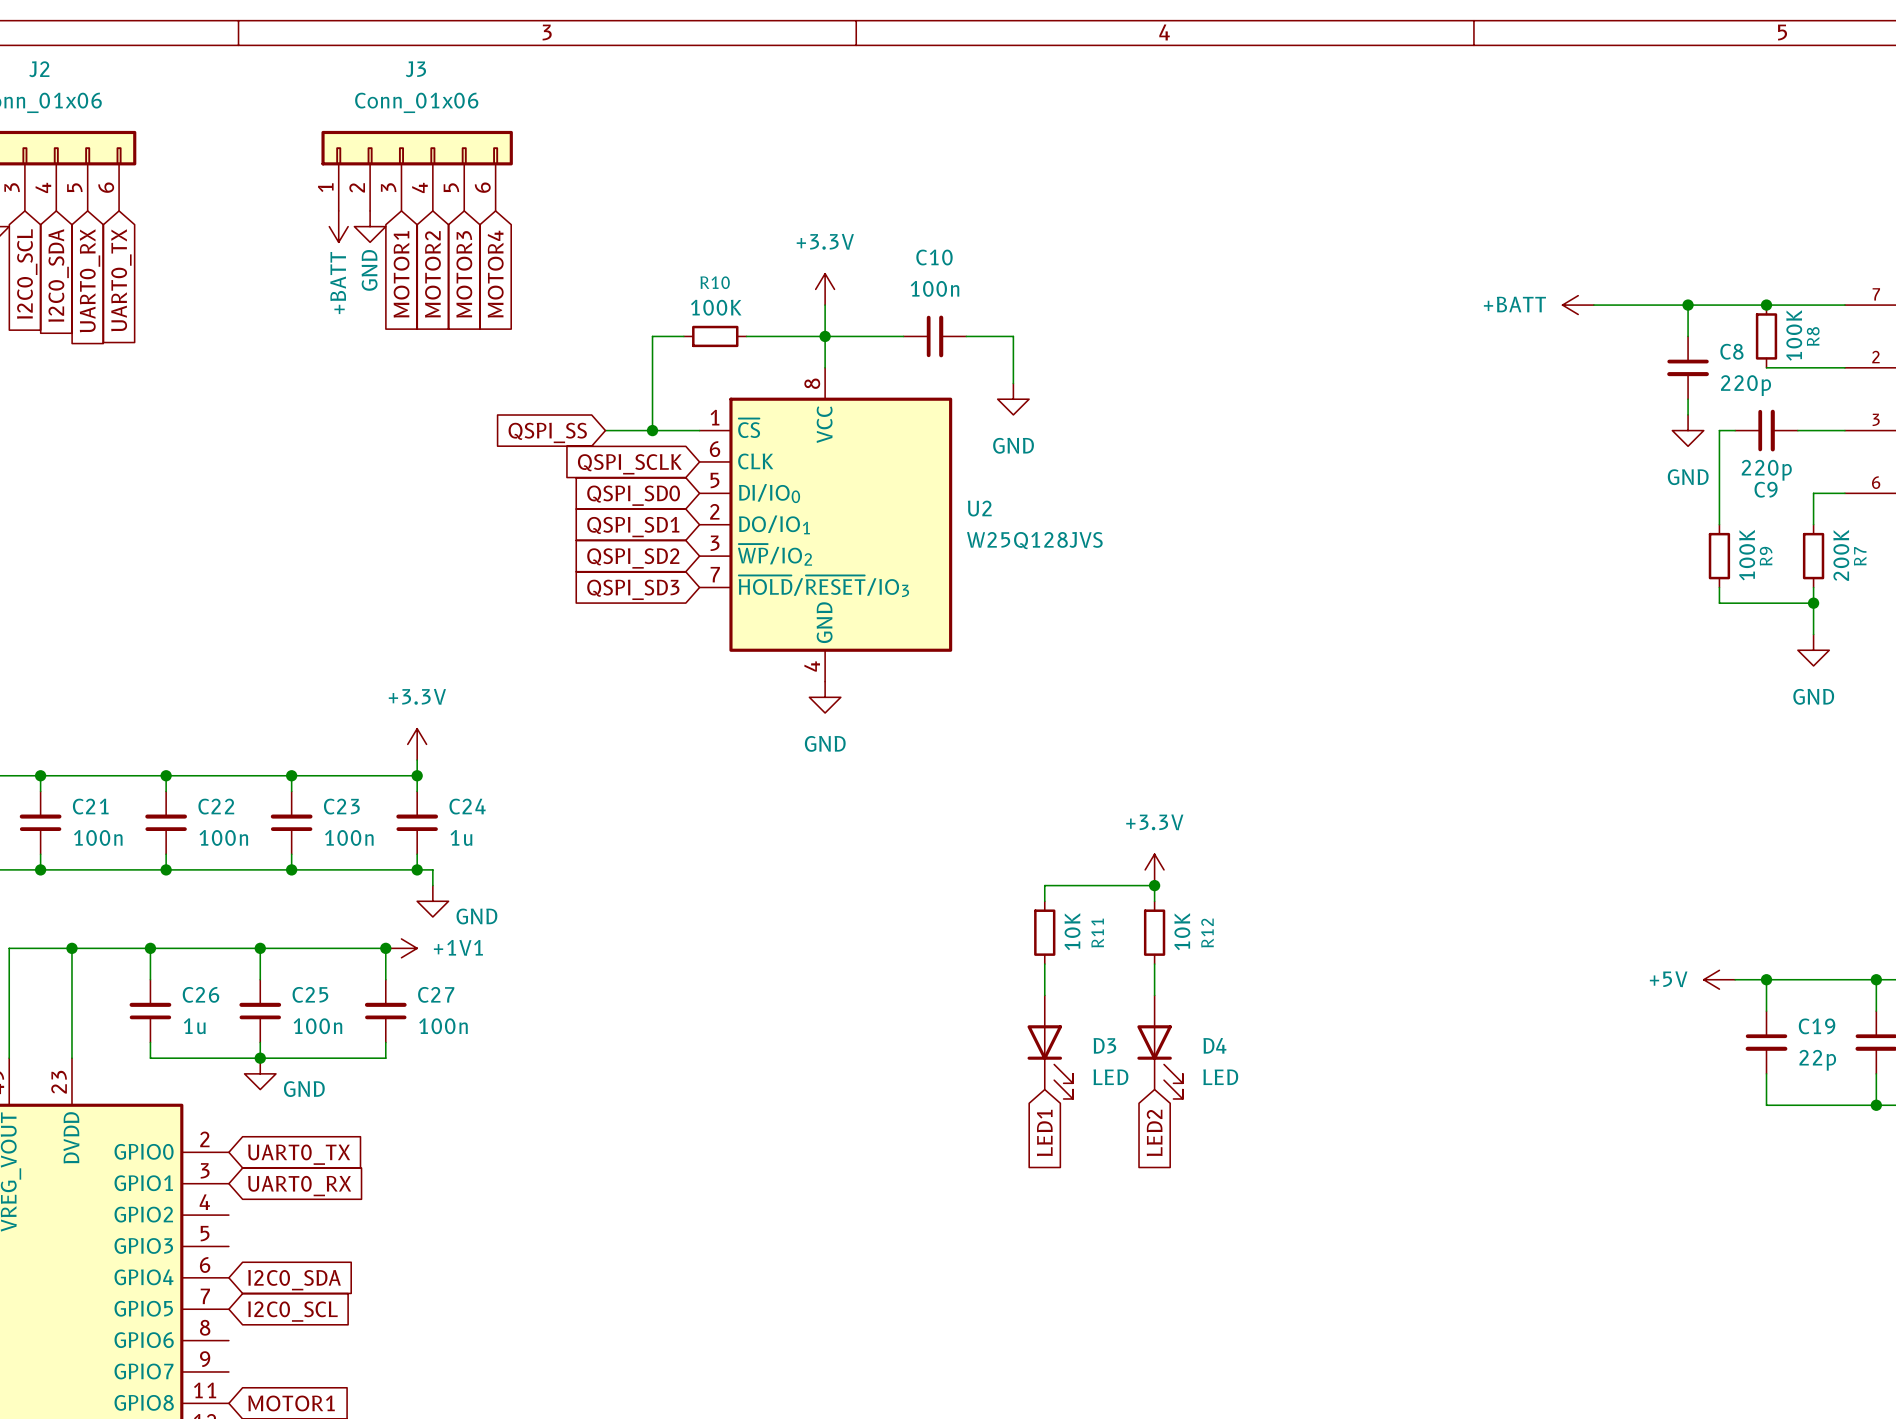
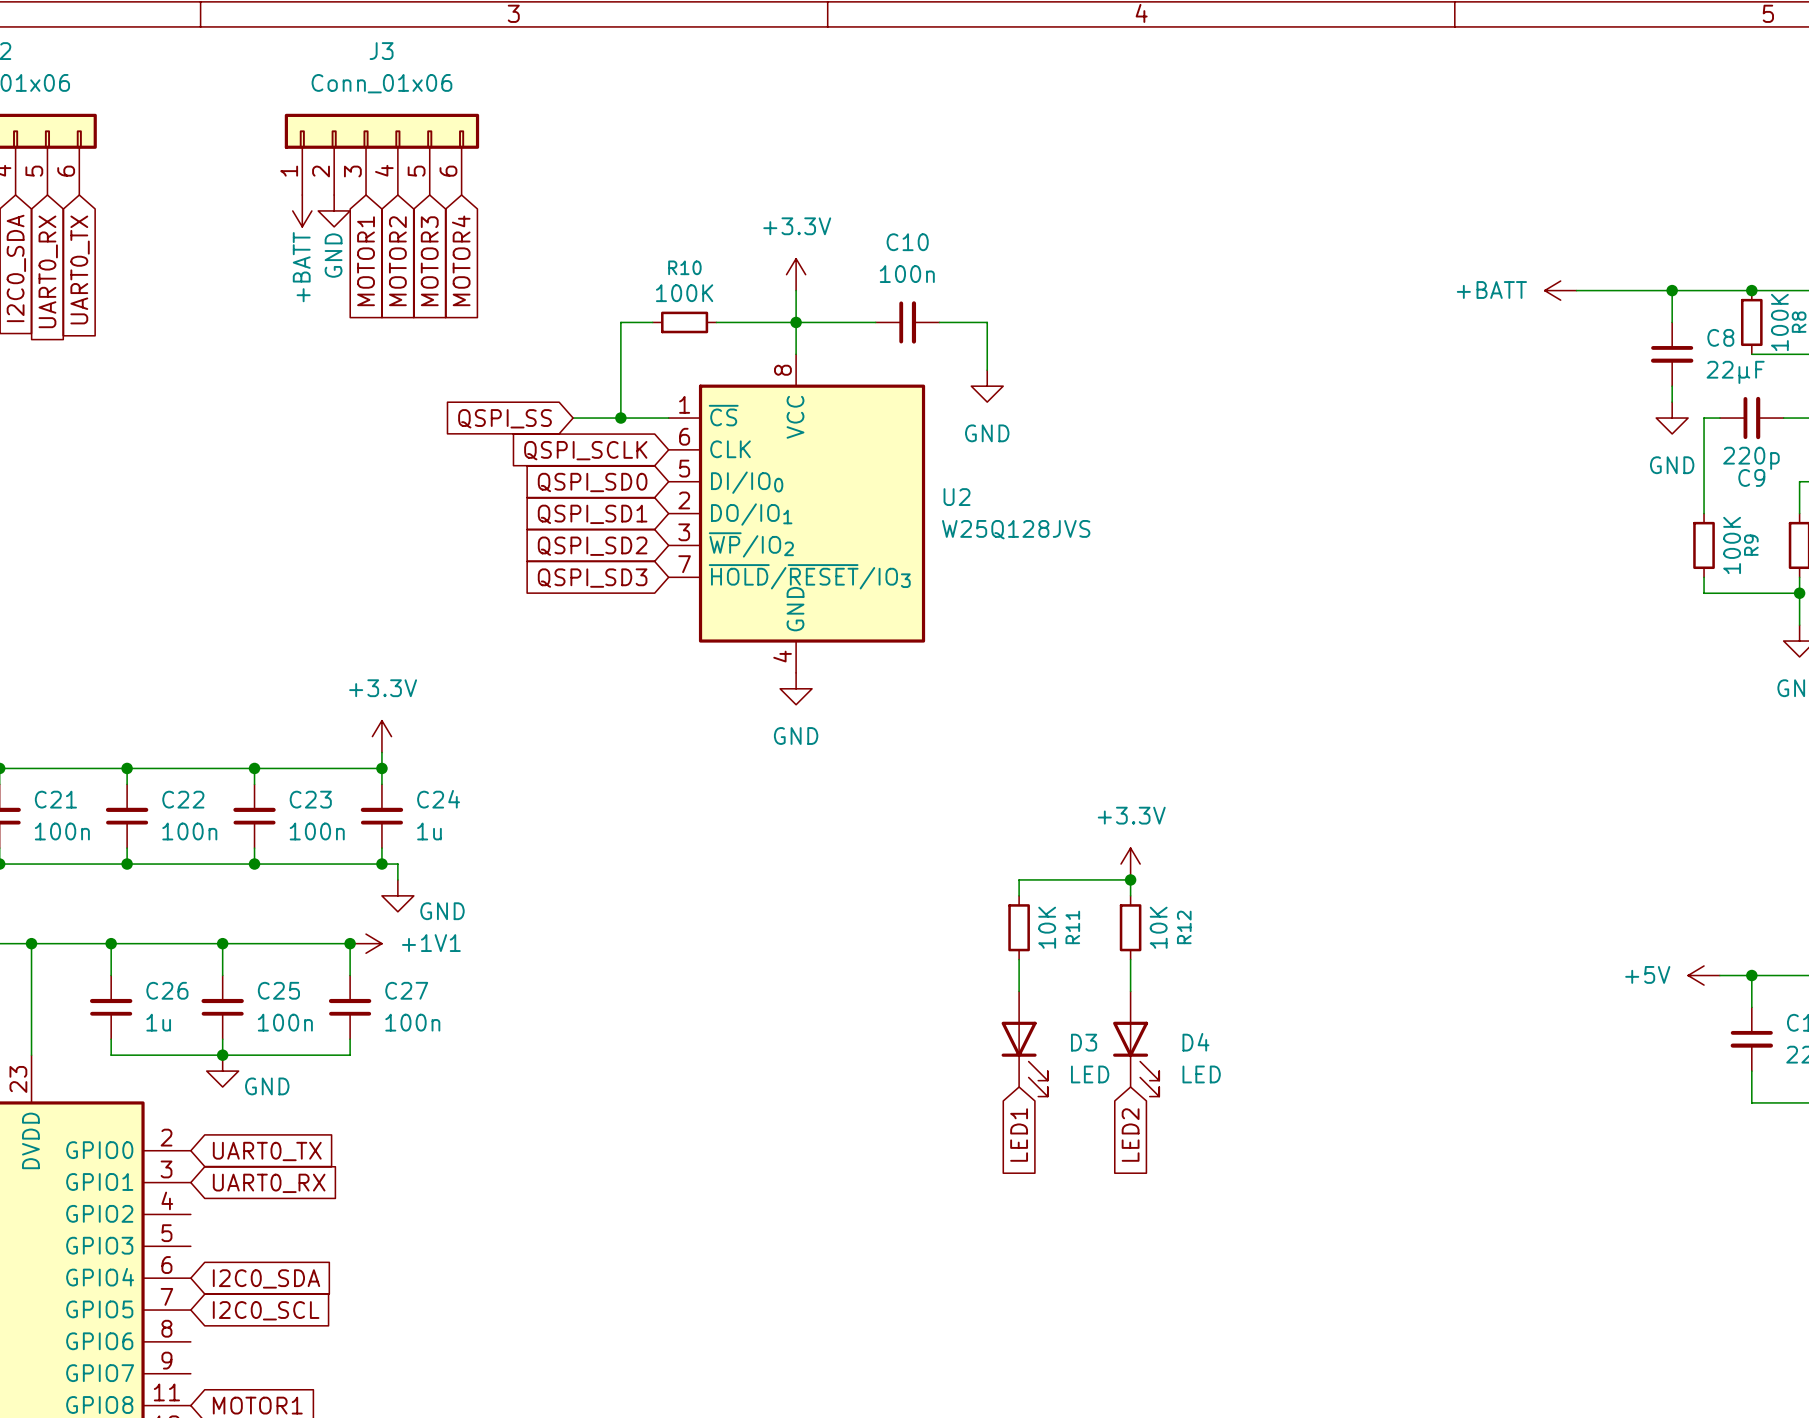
C8 value: 220p (1746, 385) -> 22µF (1735, 372)

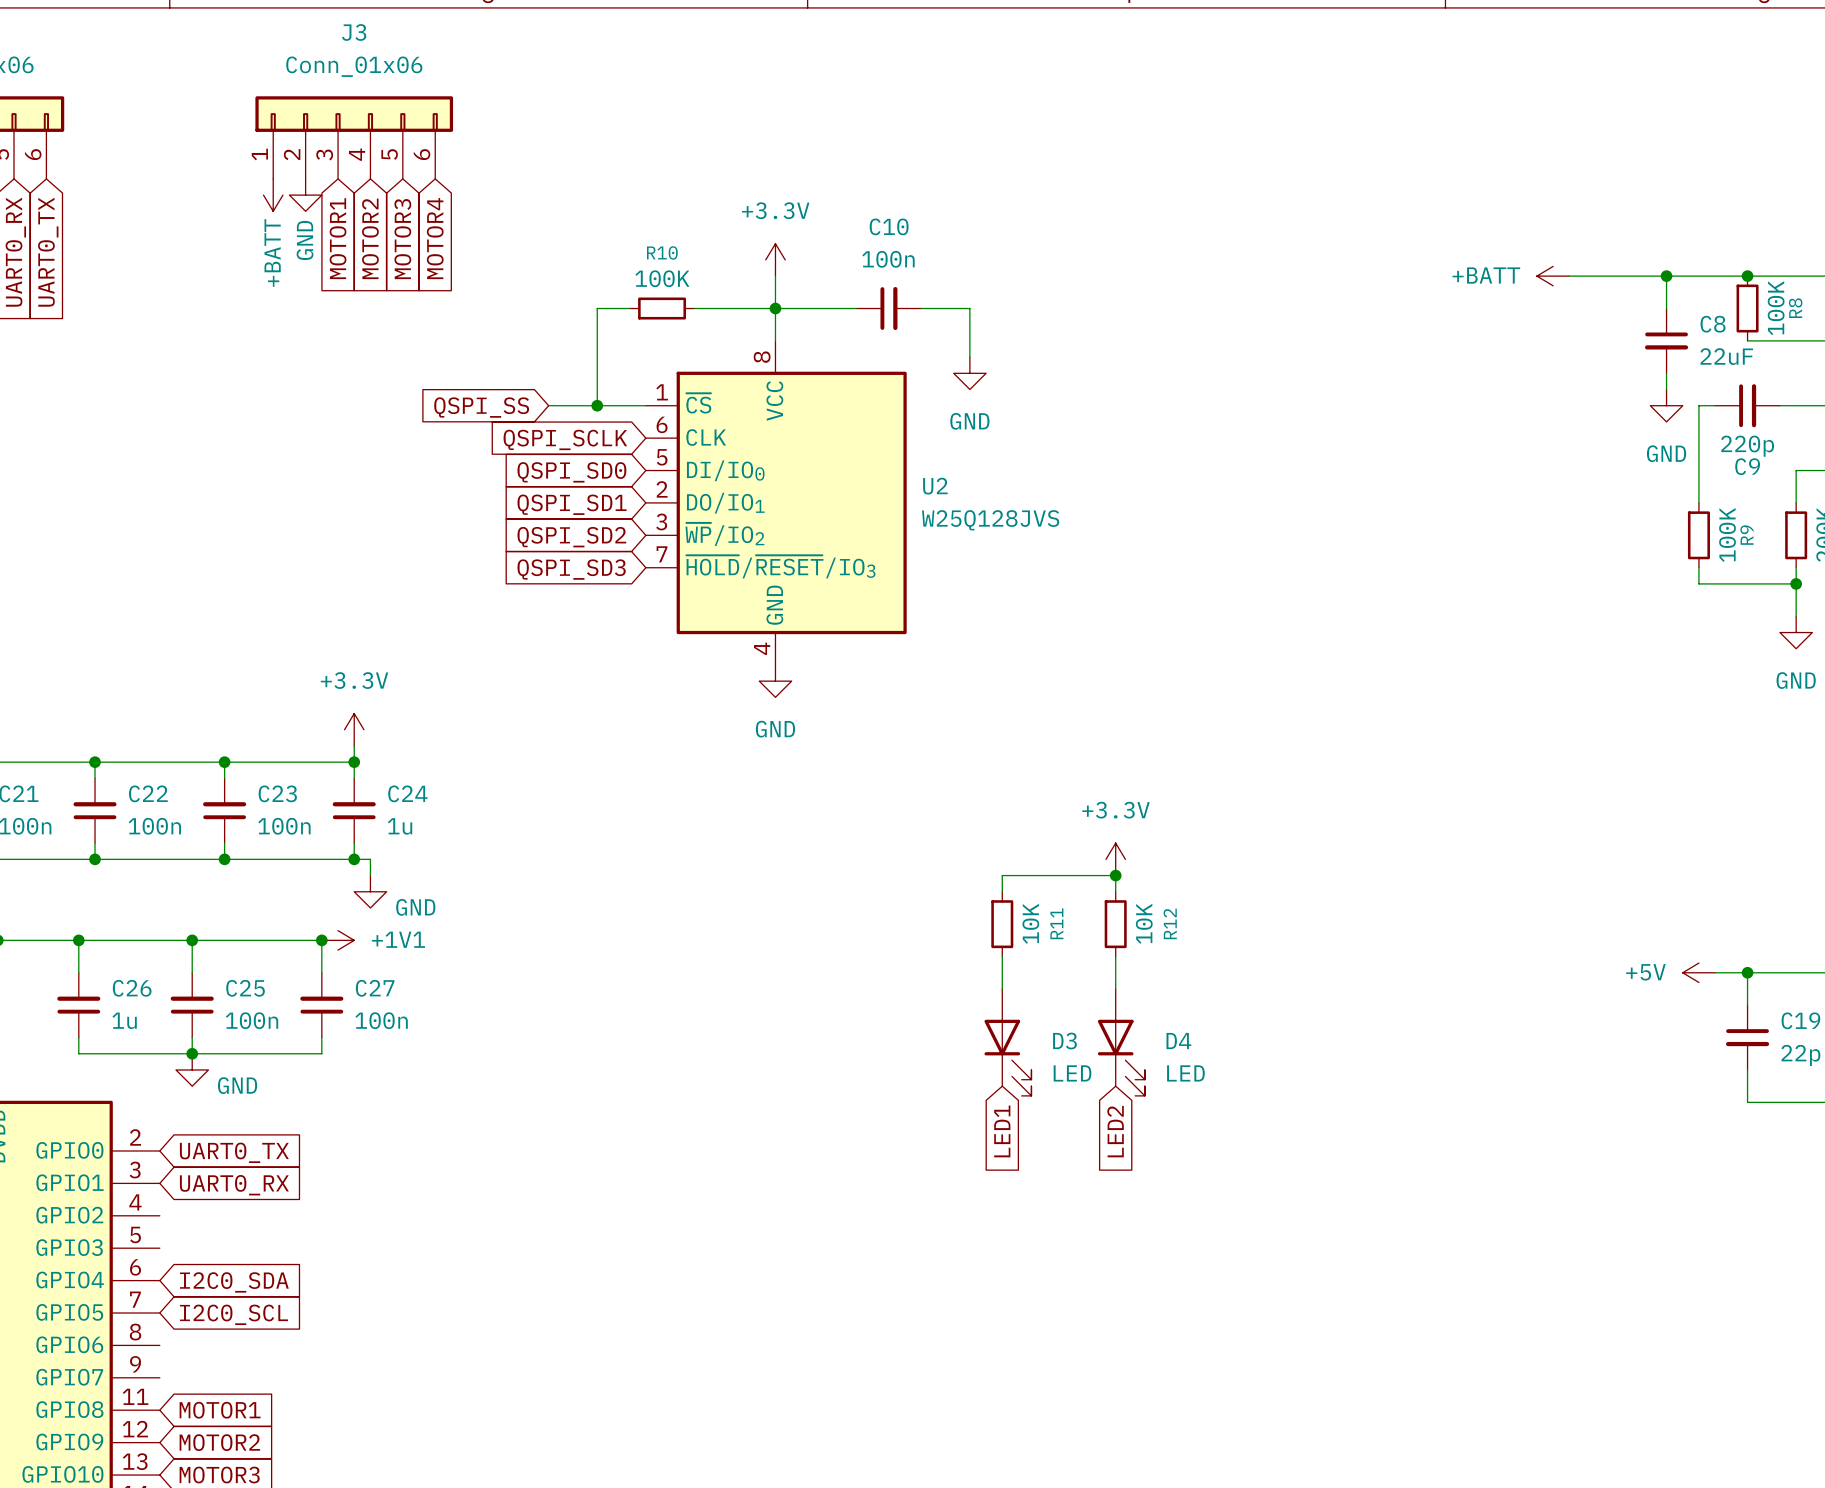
C8 value: 22µF (1735, 372) -> 22uF (1726, 356)

